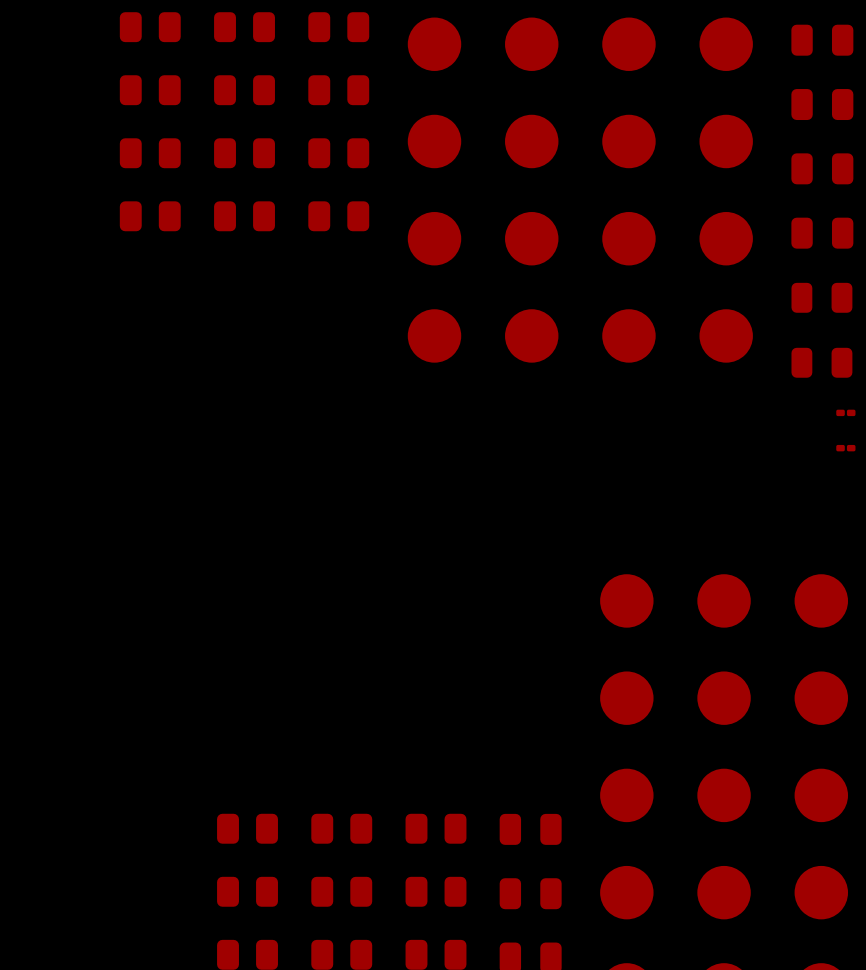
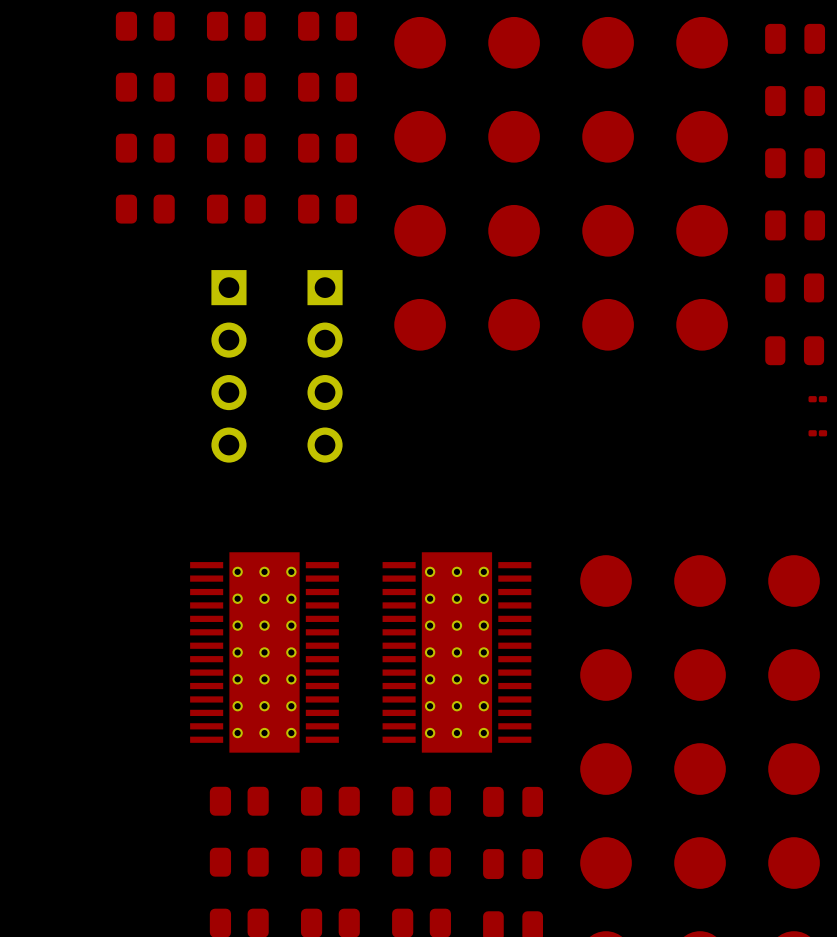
part: none -> (228, 366)
part: none -> (325, 366)
part: none -> (264, 652)
part: none -> (456, 652)

